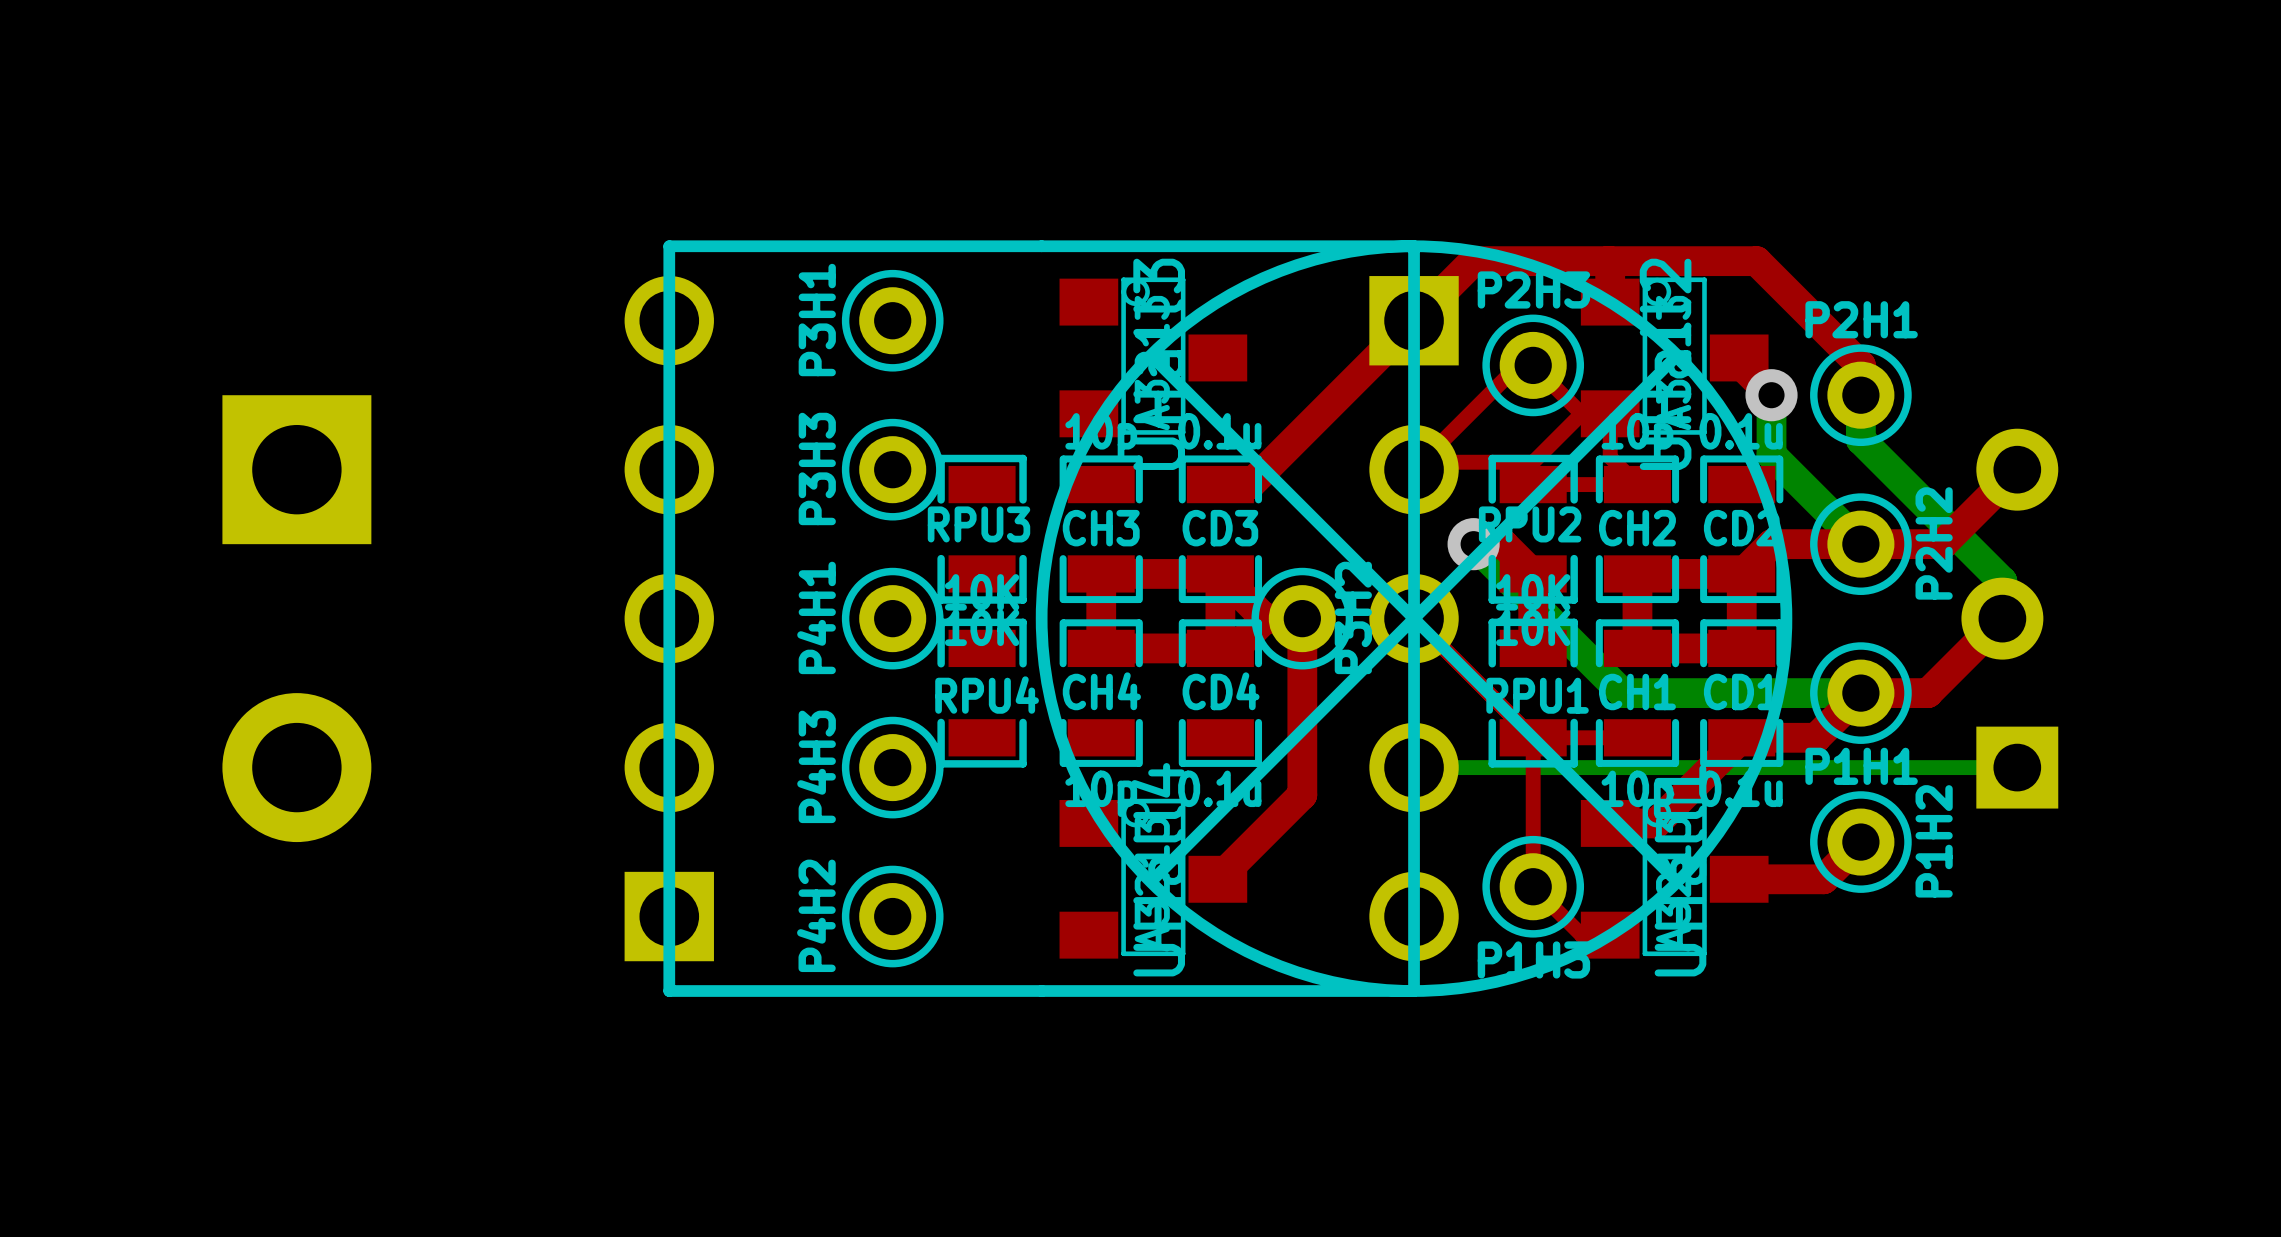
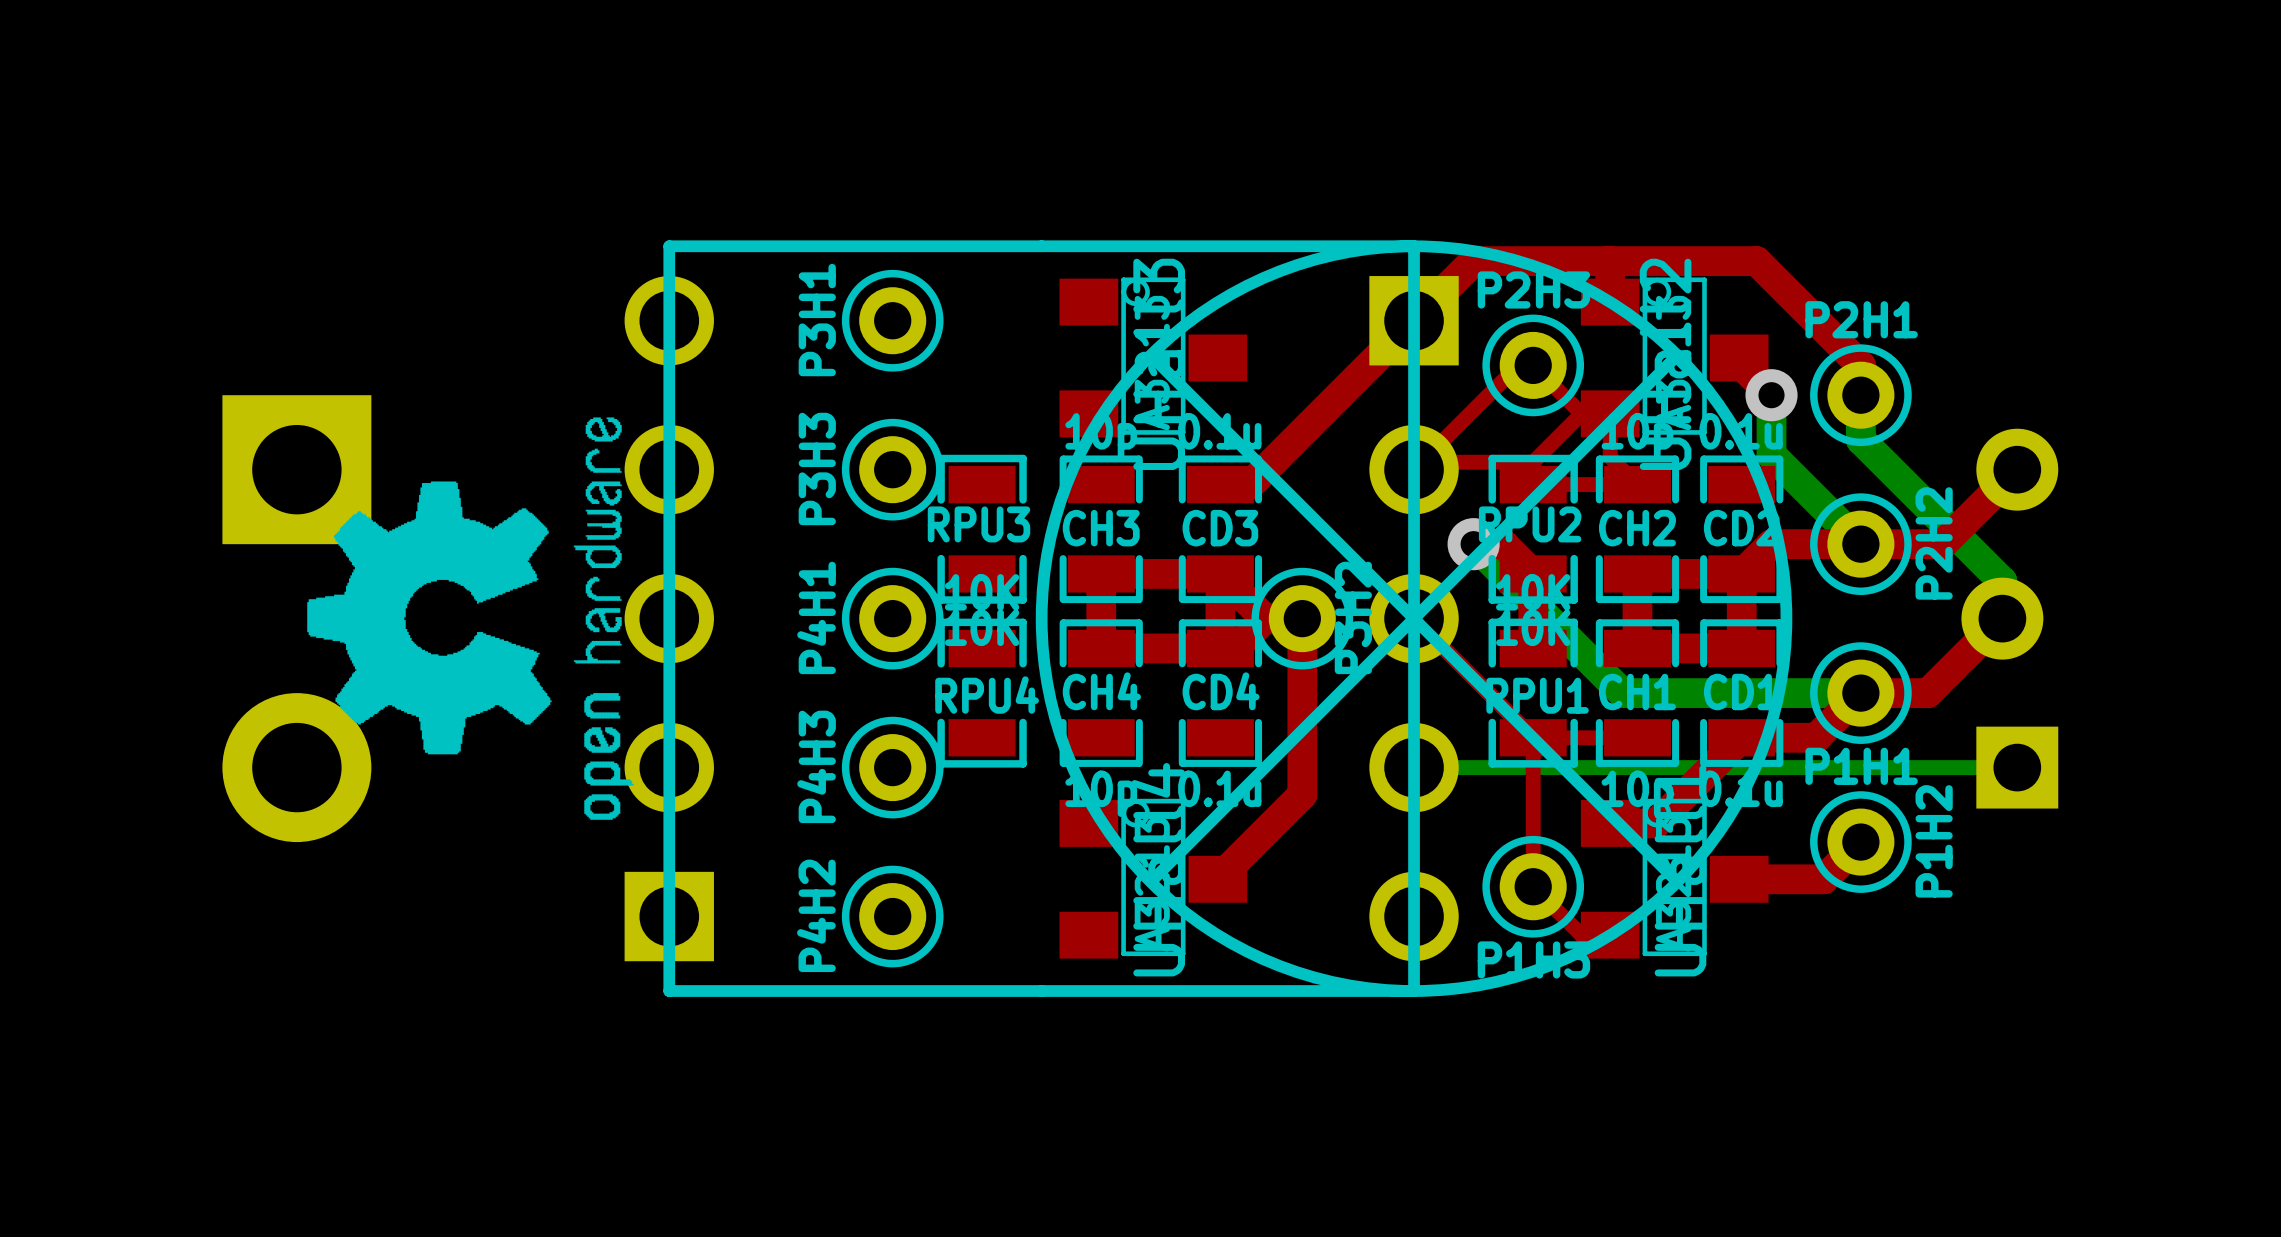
drawing: none -> [307, 417, 634, 820]

